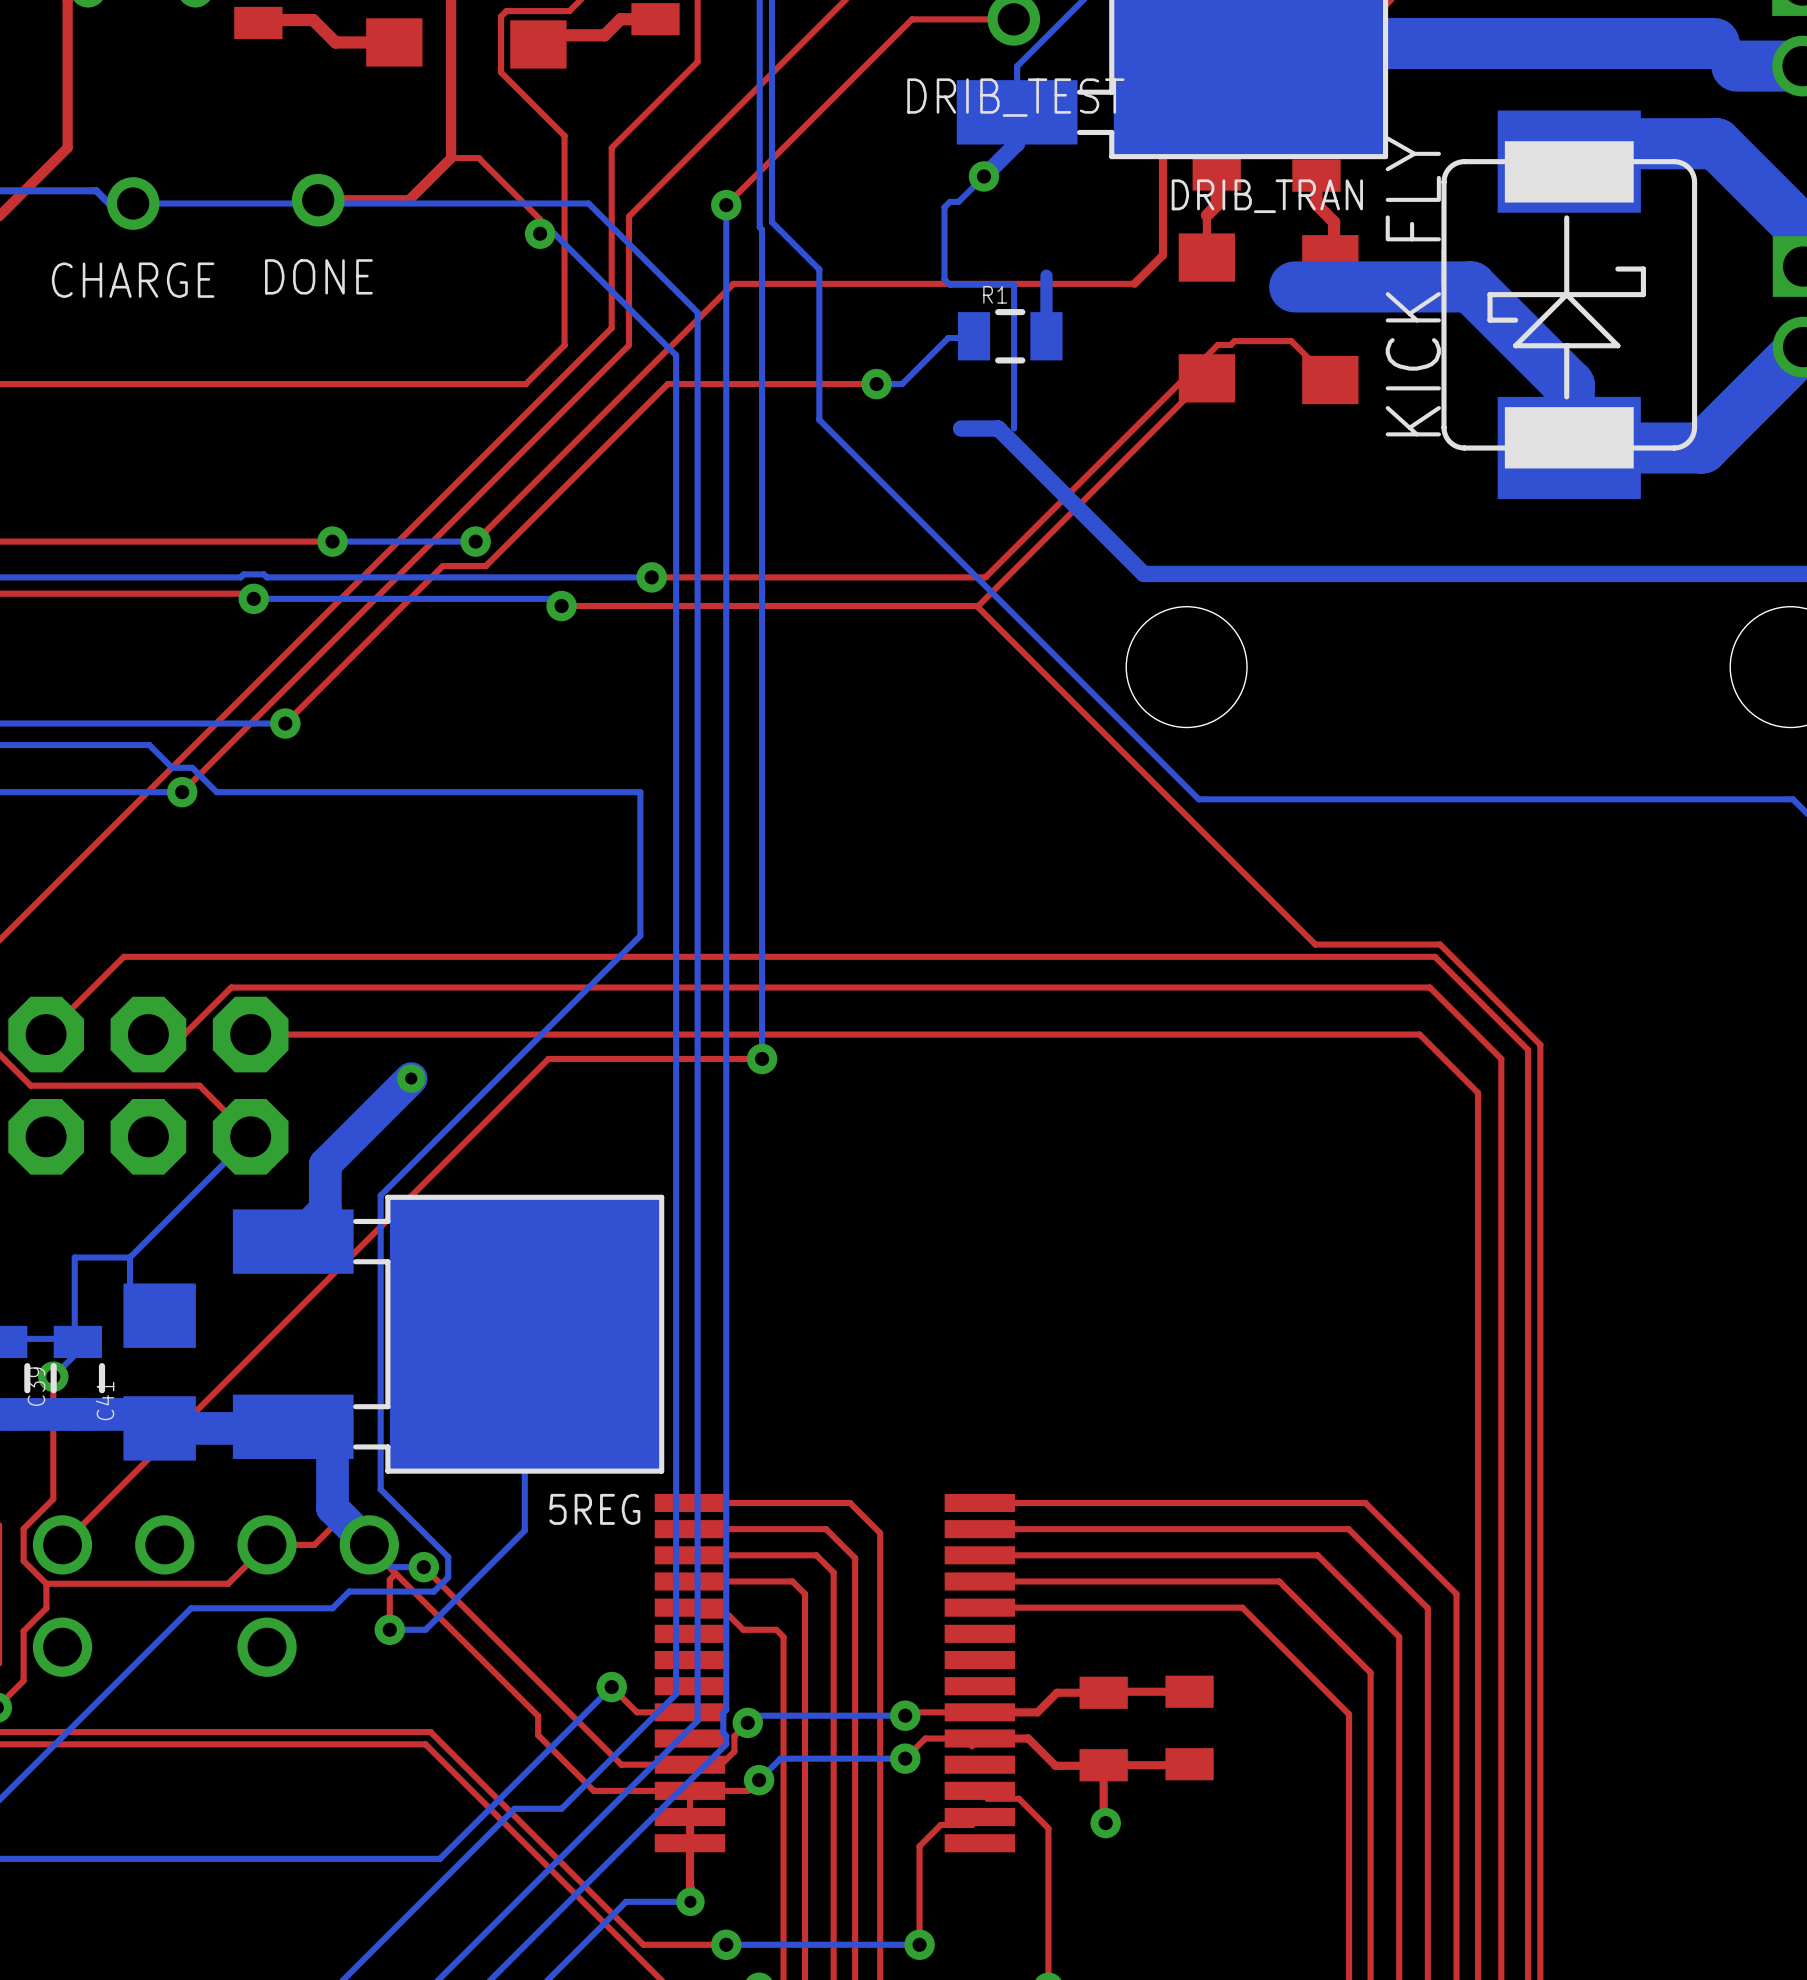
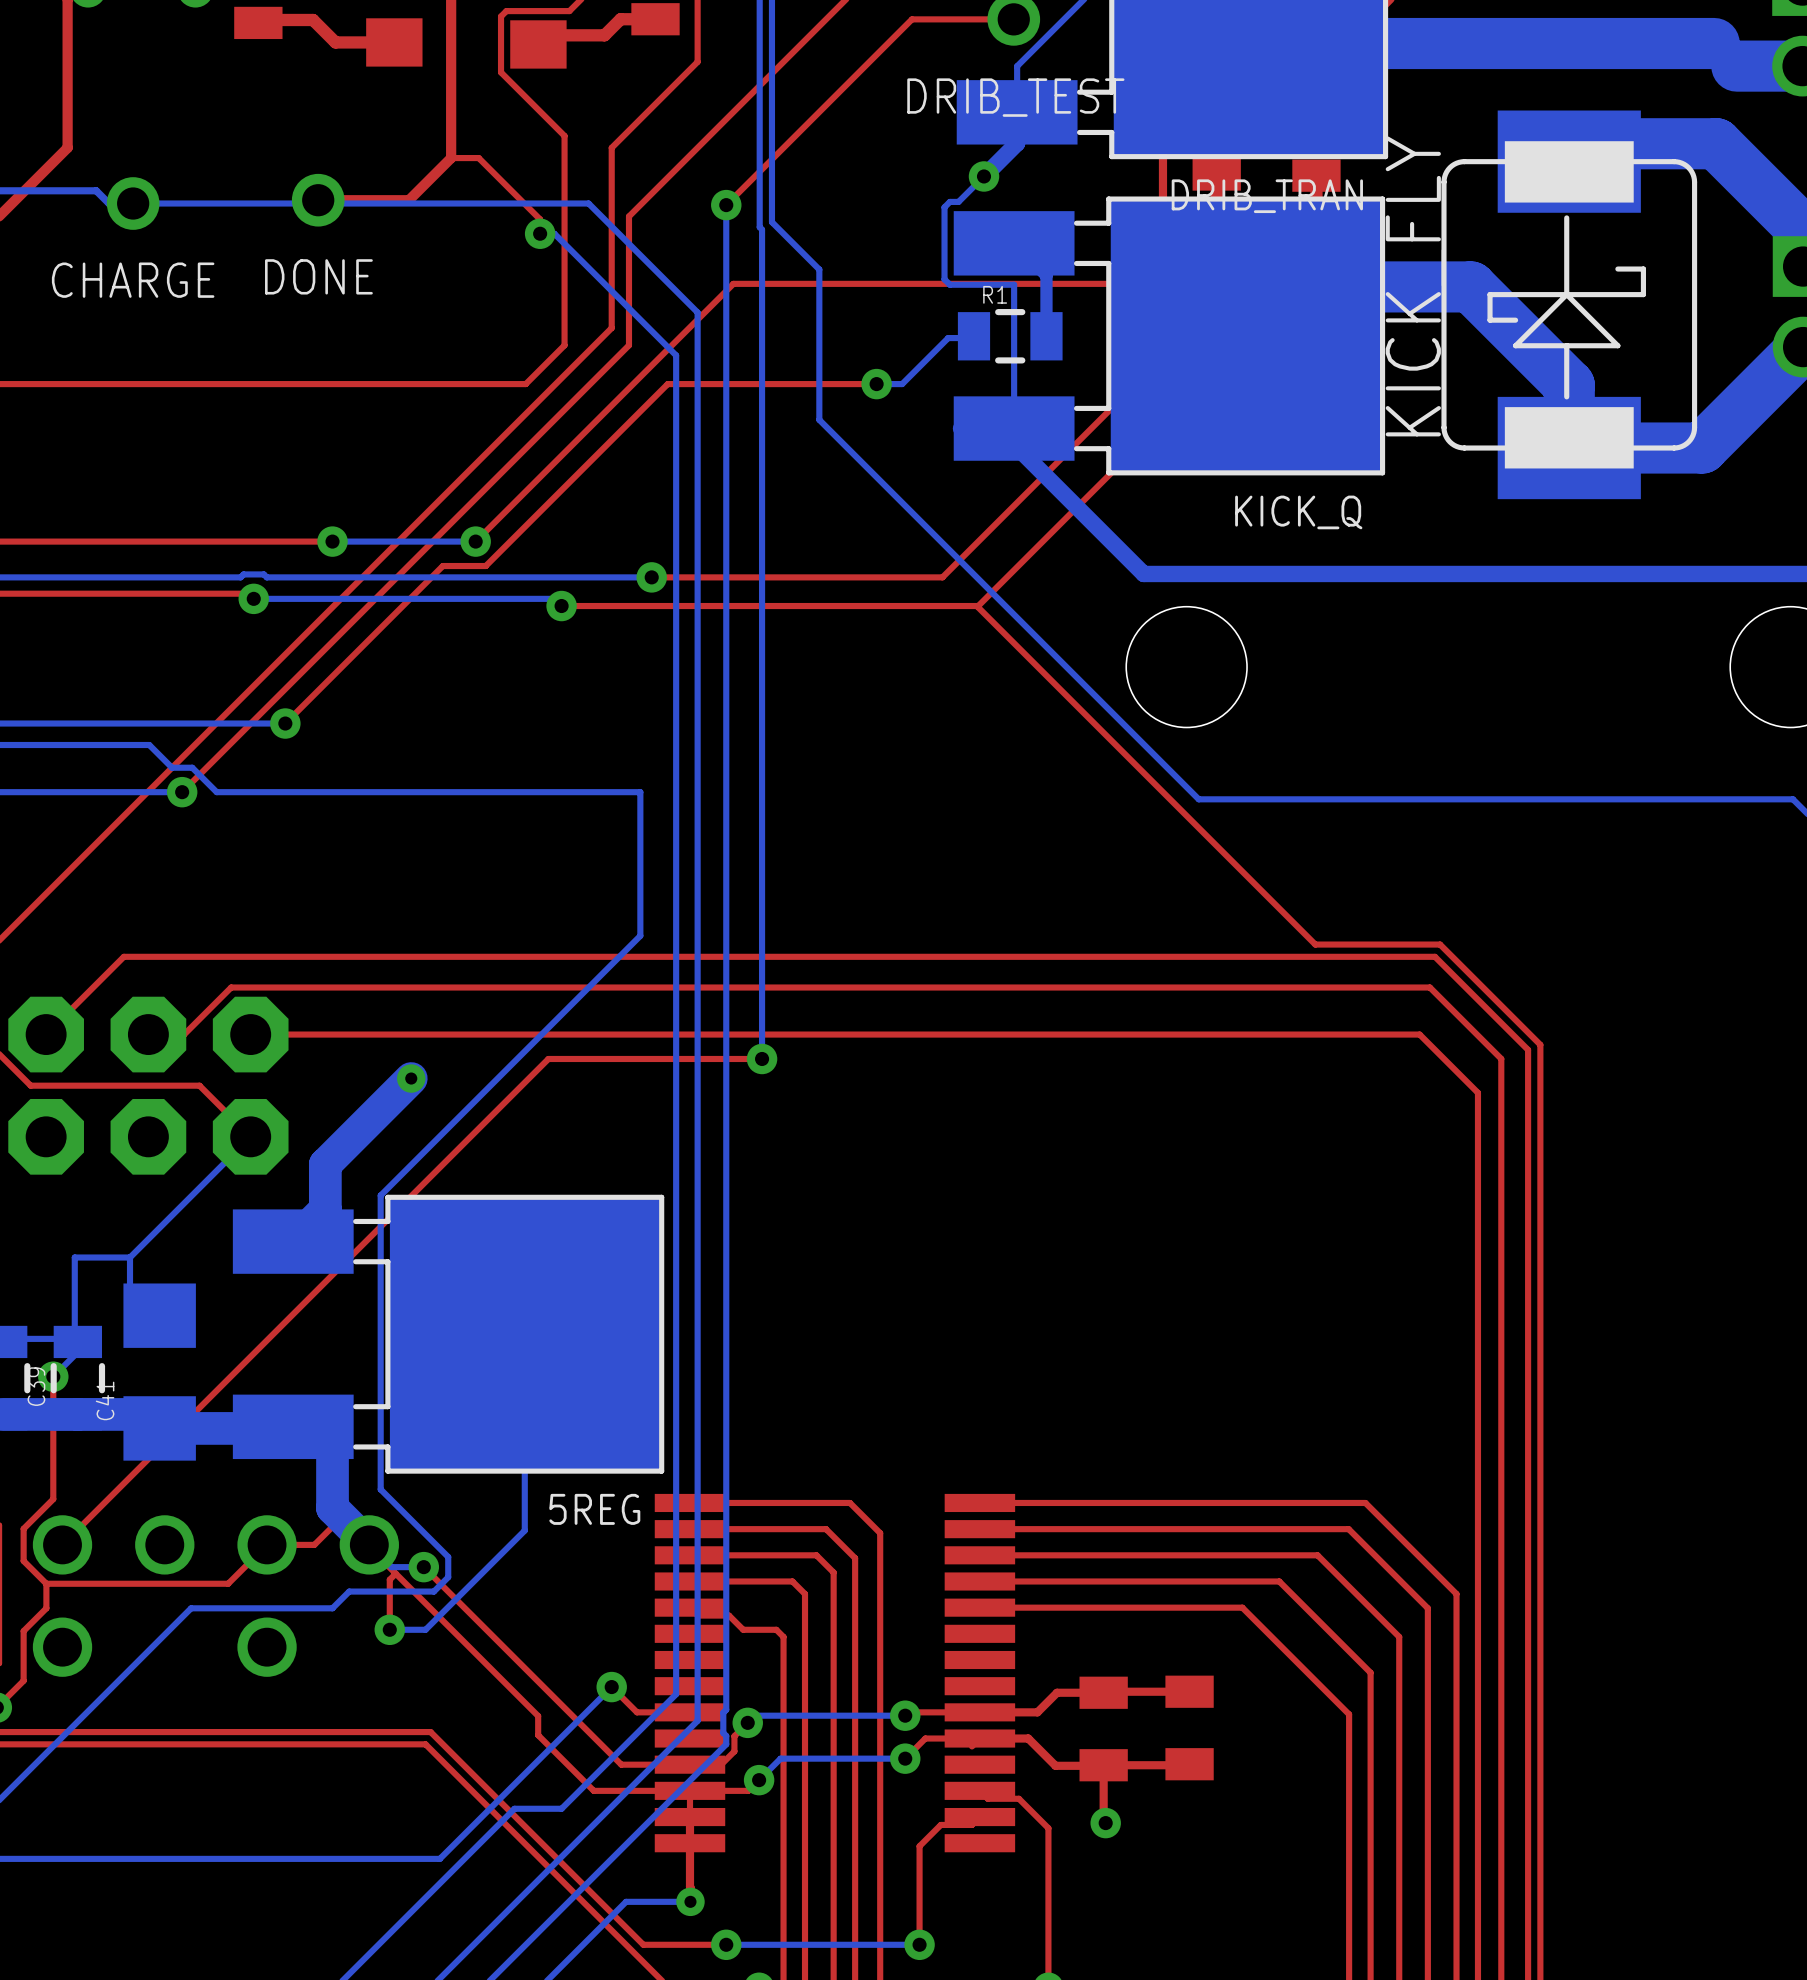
KICK_Q: none -> (1169, 335)
top track: (1217, 344) (985, 577) (942, 577) -> (1217, 344) (1174, 344) (942, 577)

